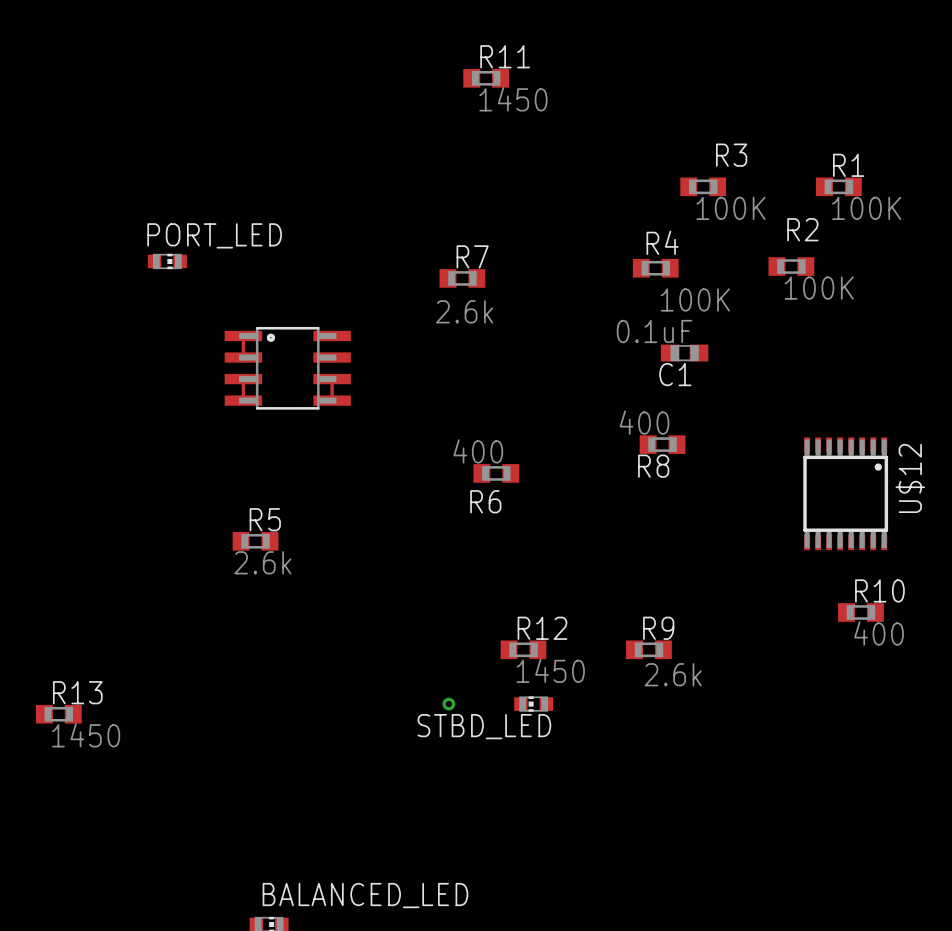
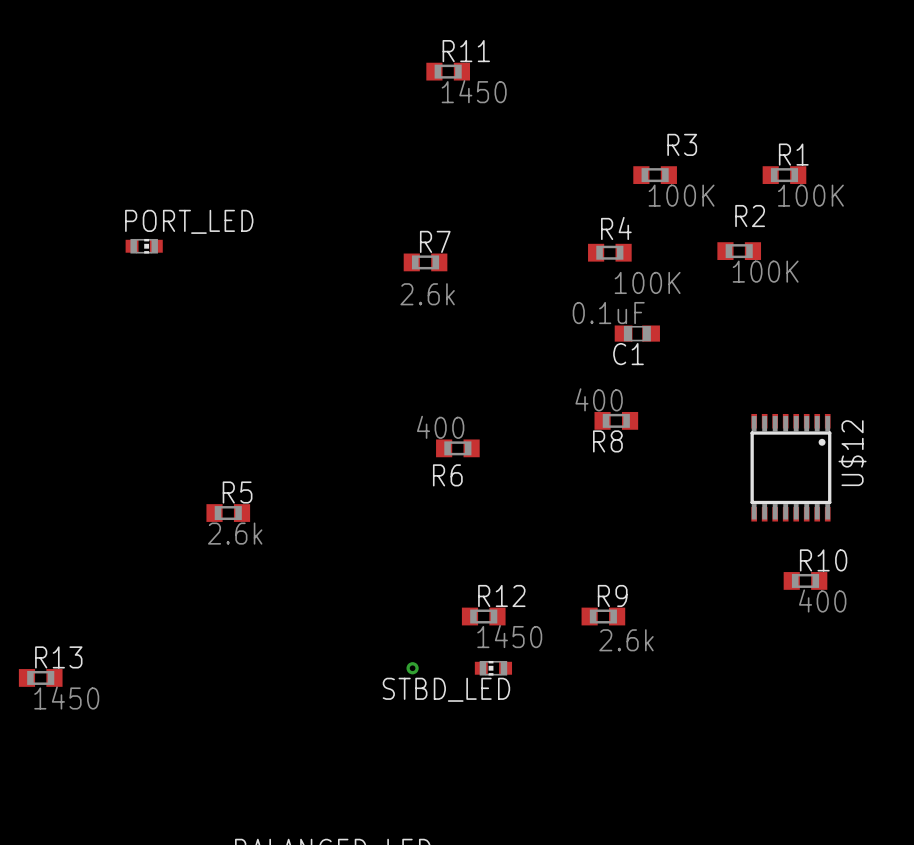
track: (243, 335) (243, 357) -> none
part: (287, 368) -> none
track: (243, 379) (243, 400) -> none
track: (332, 379) (332, 400) -> none

